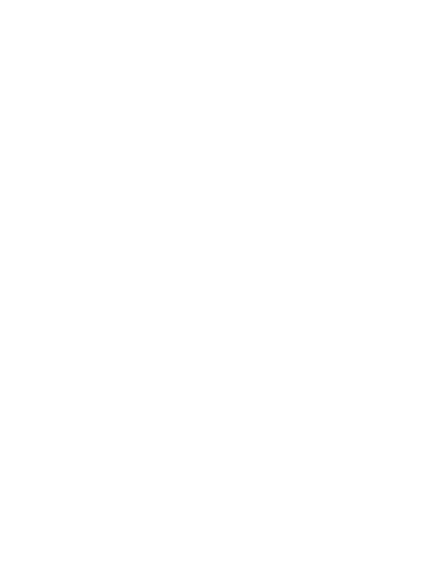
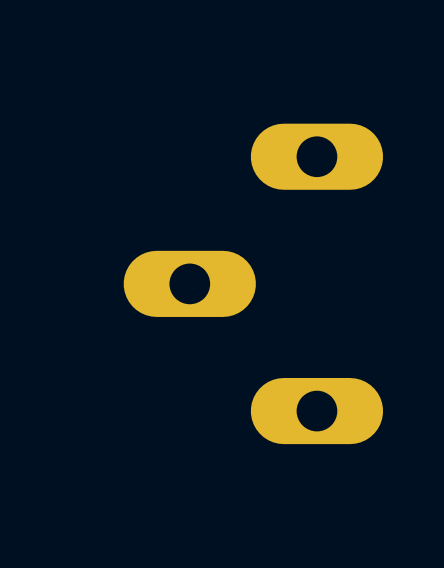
part: none -> (253, 283)

